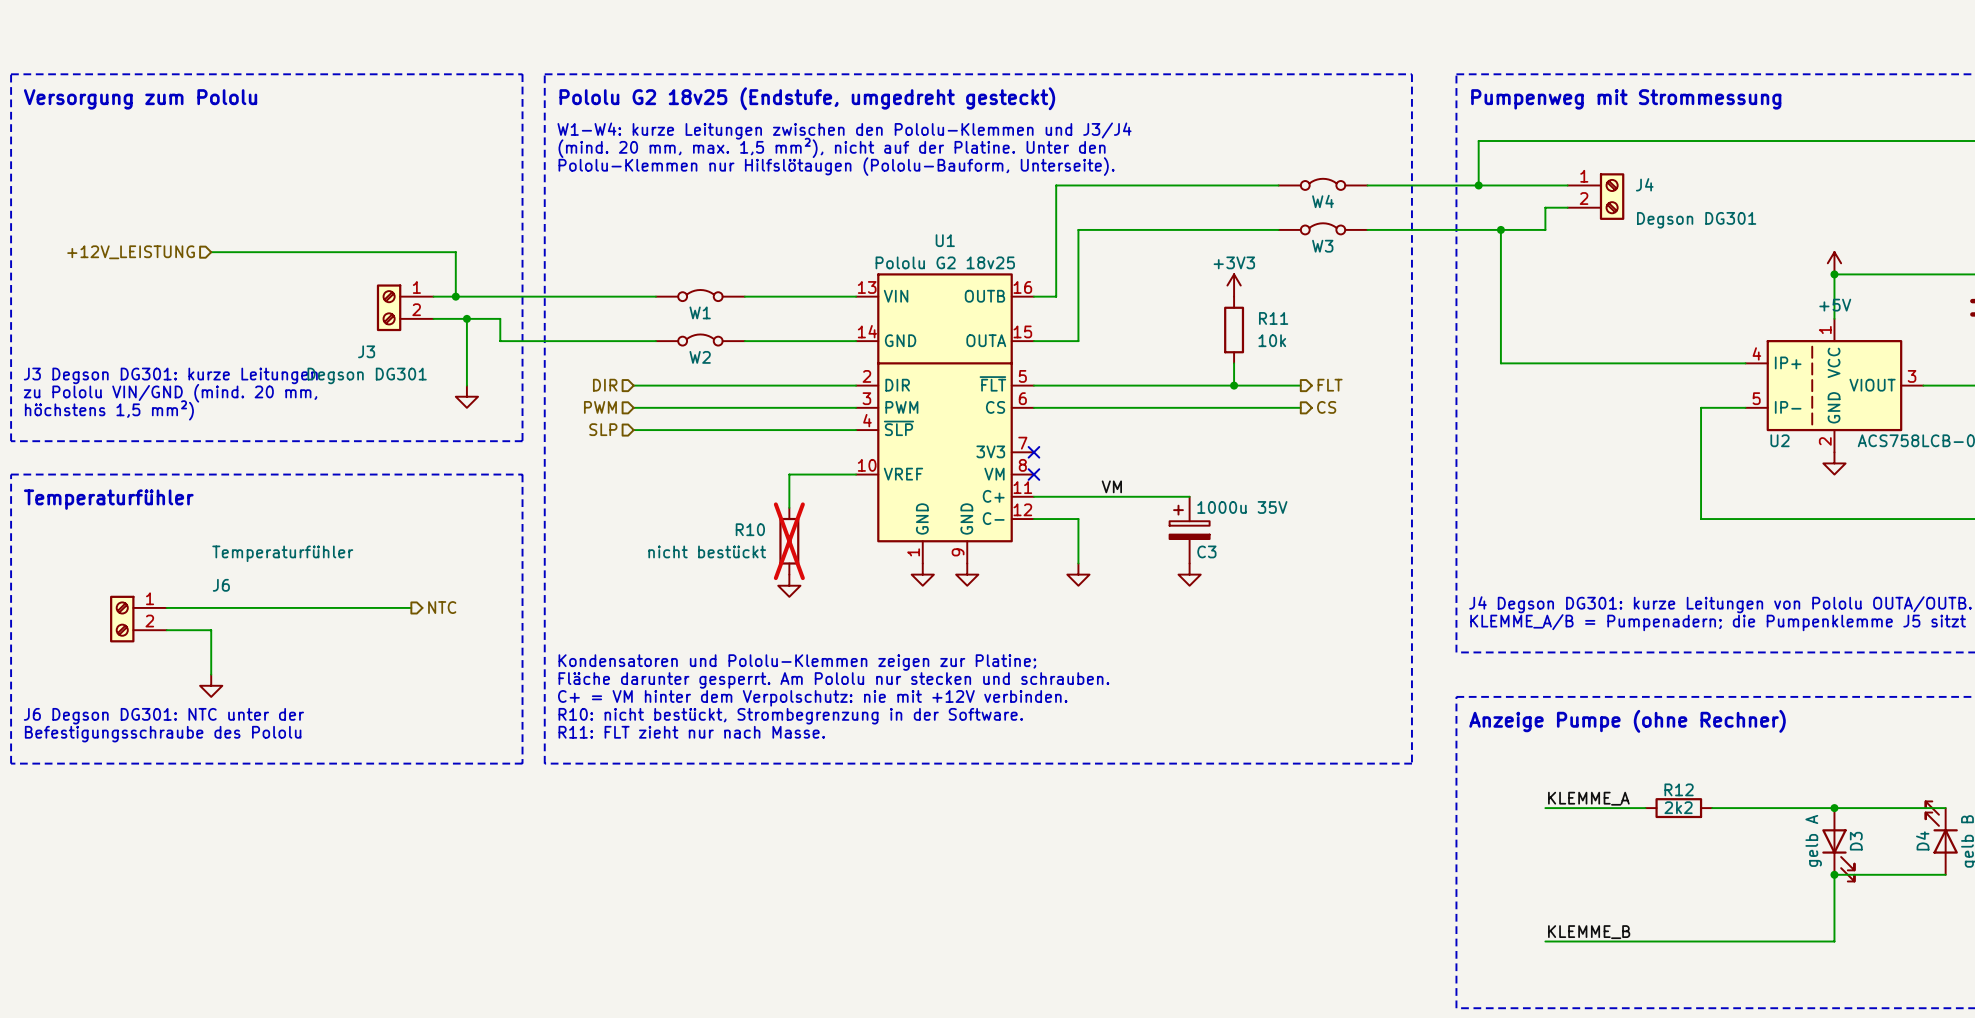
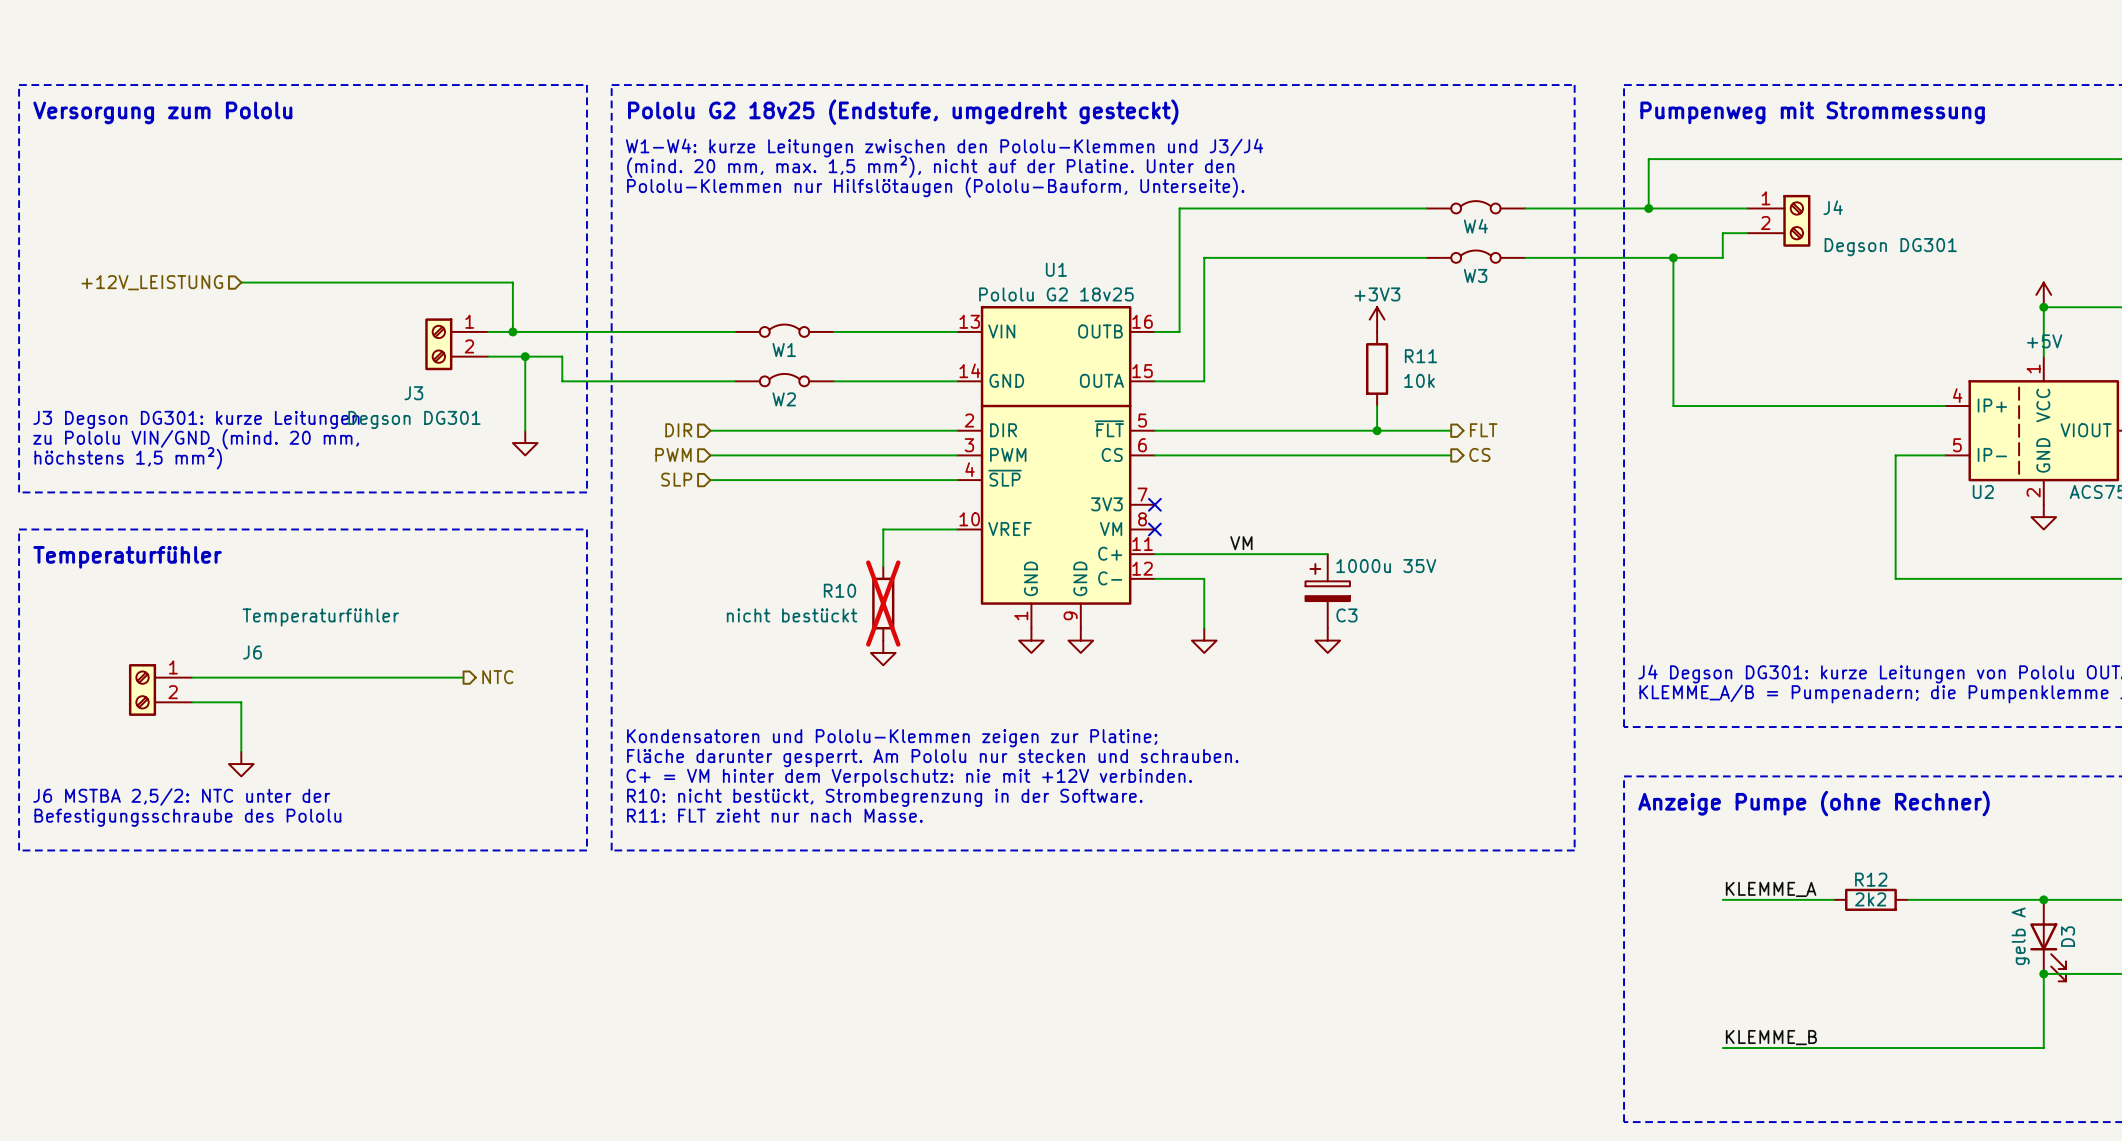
text: J6 Degson DG301: NTC unter der (163, 716) -> J6 MSTBA 2,5/2: NTC unter der (181, 796)

